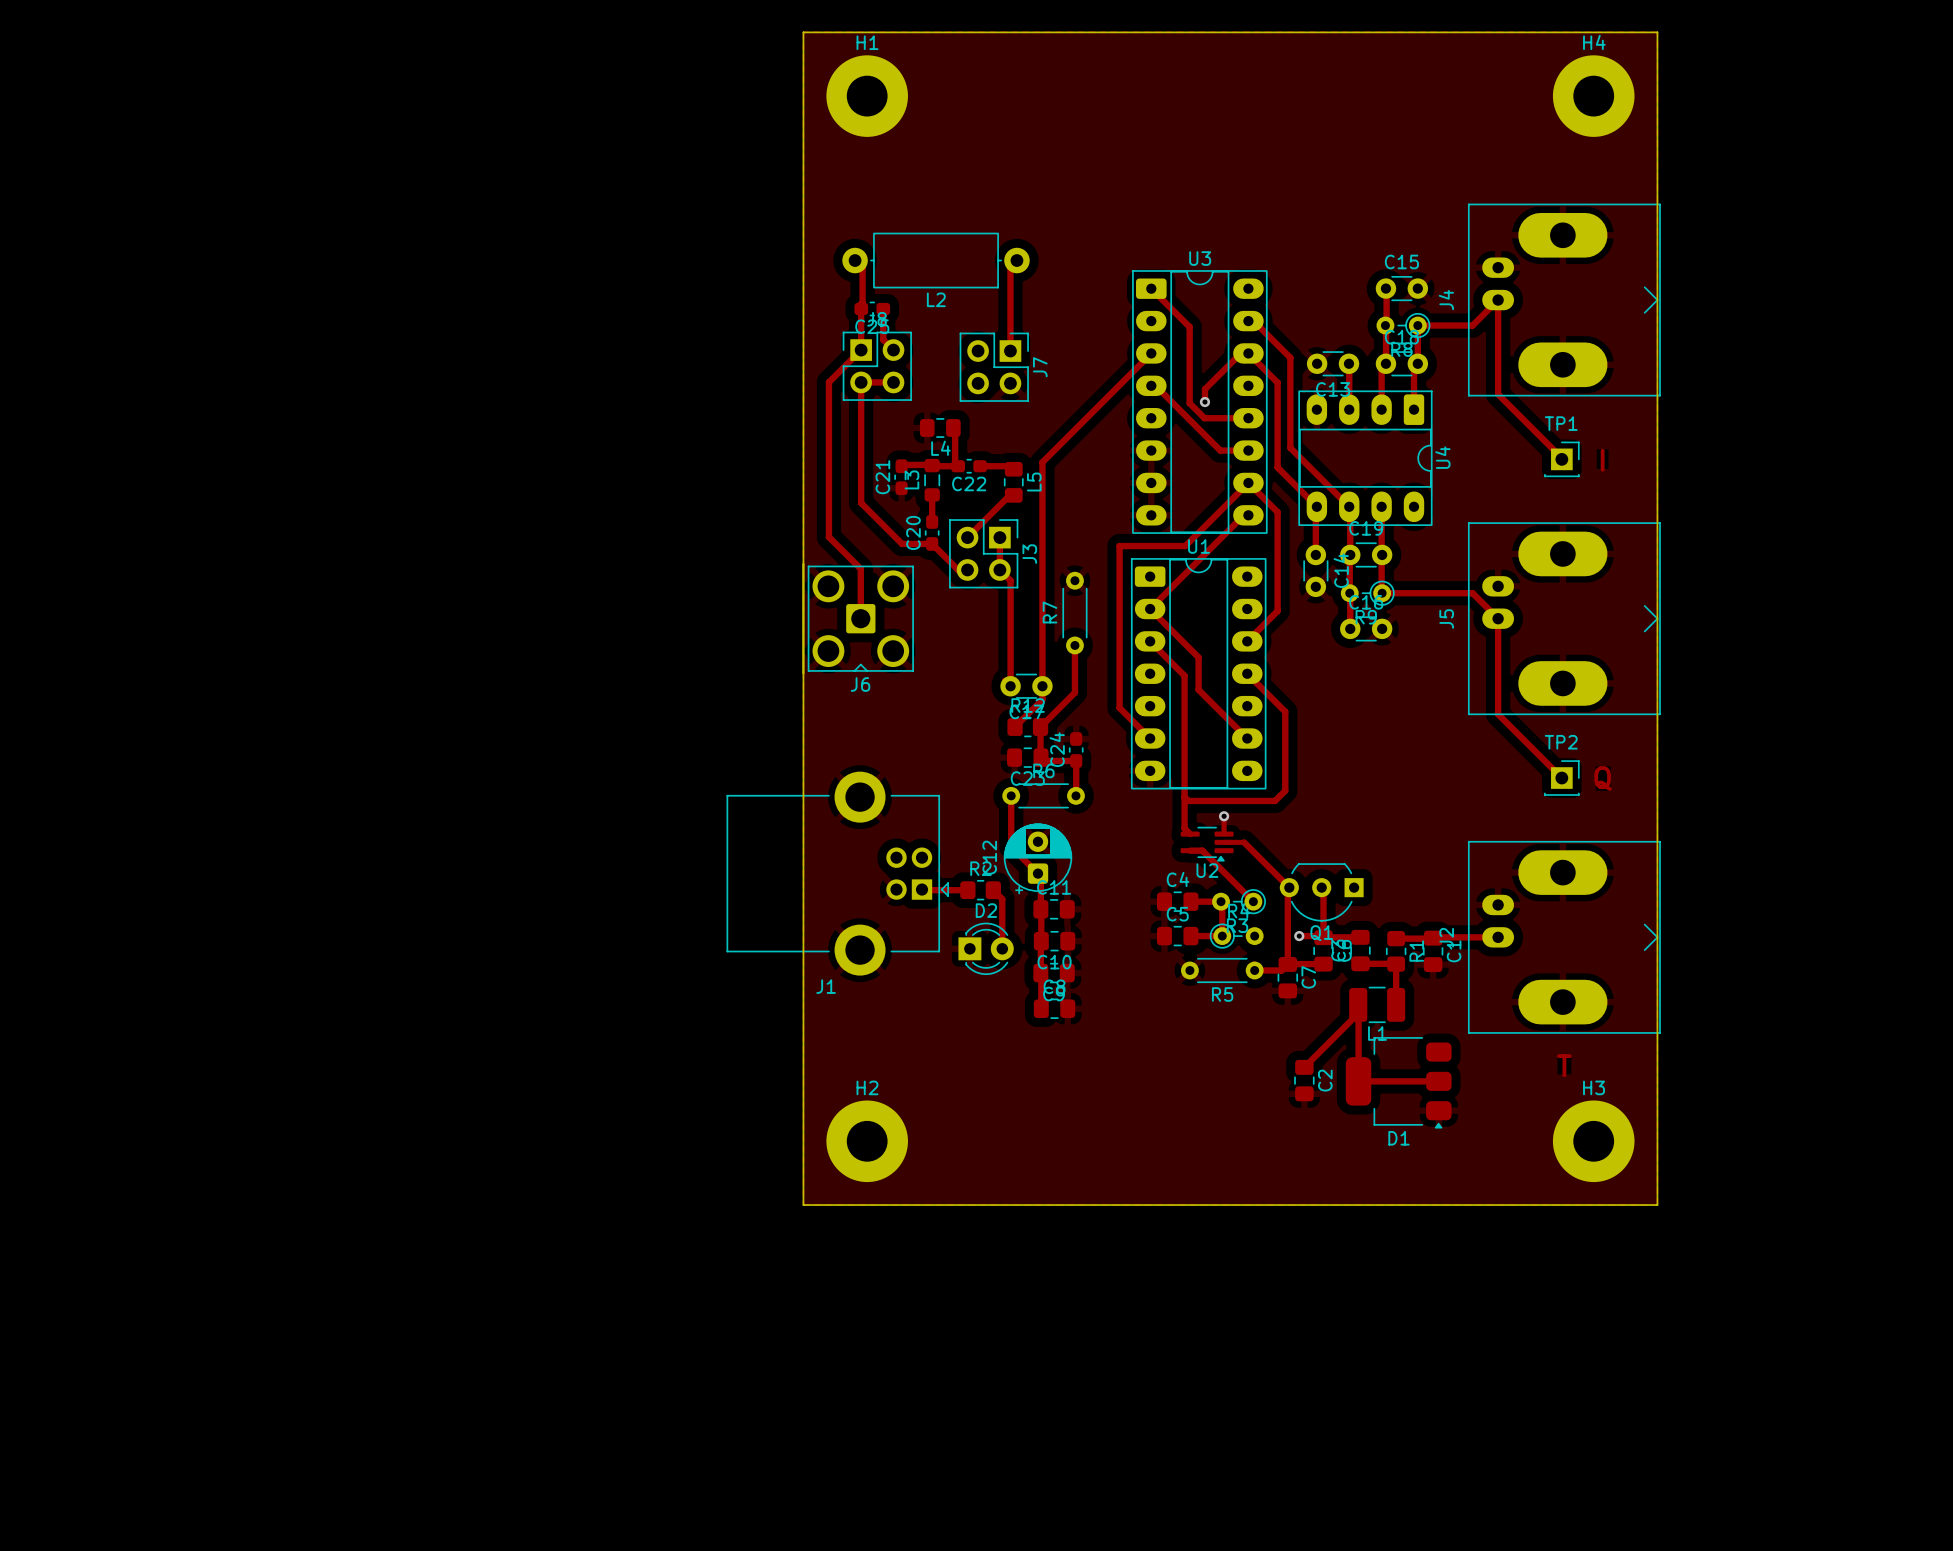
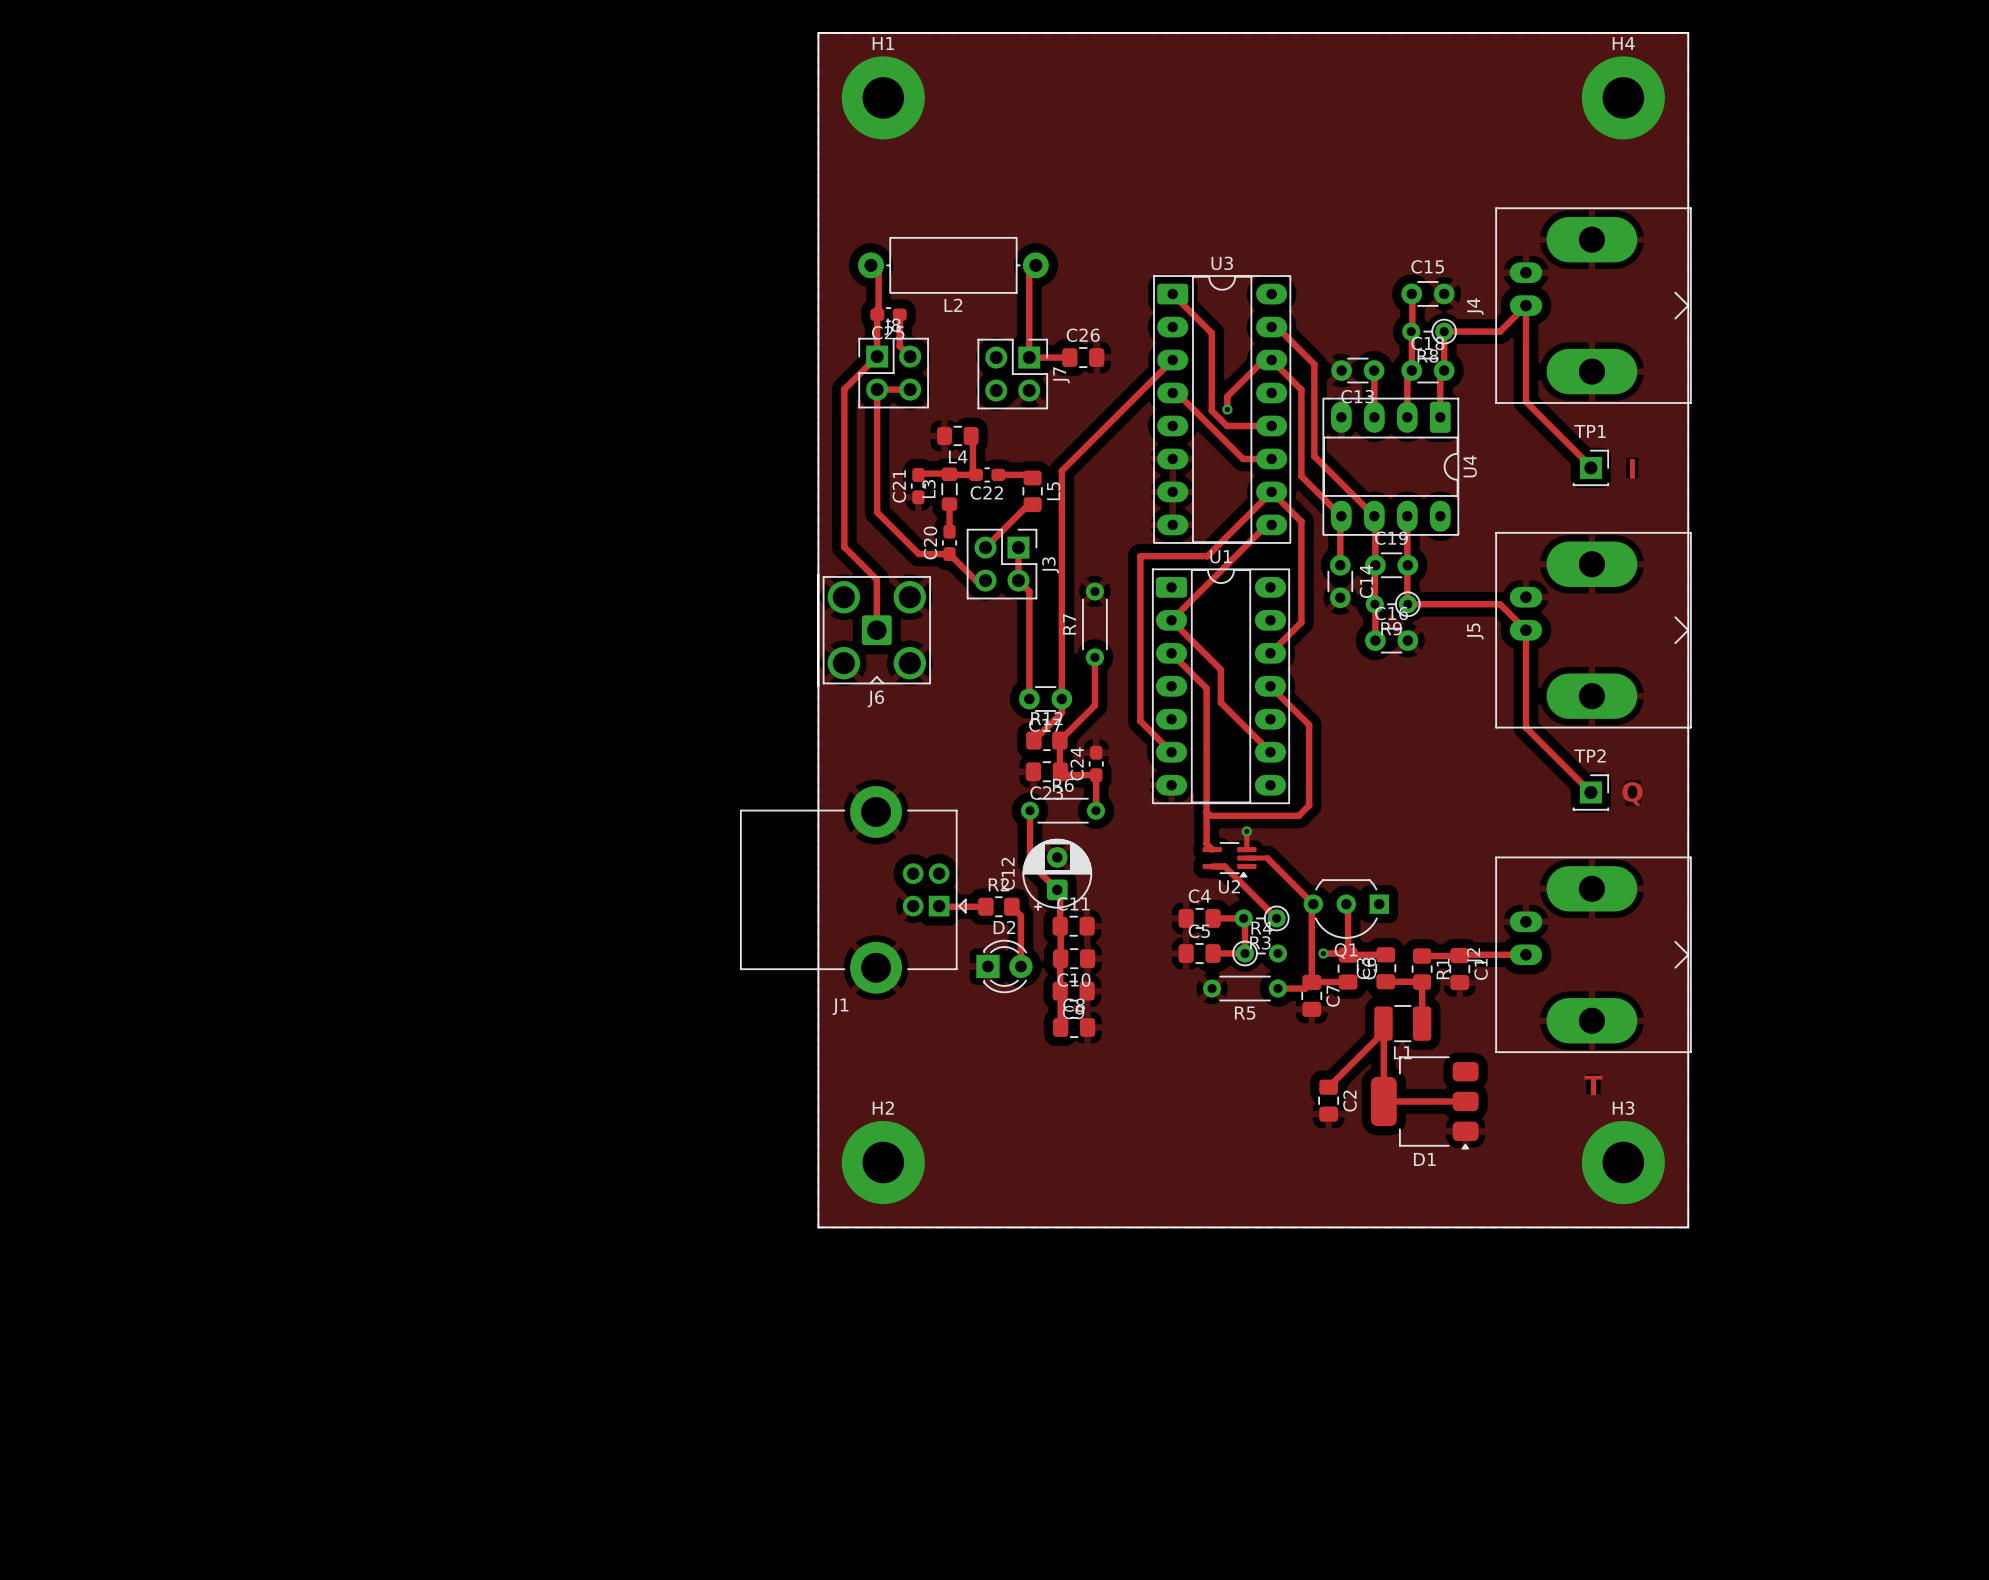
track: none -> (1029, 357) (1069, 357)
C26: none -> (1083, 357)

